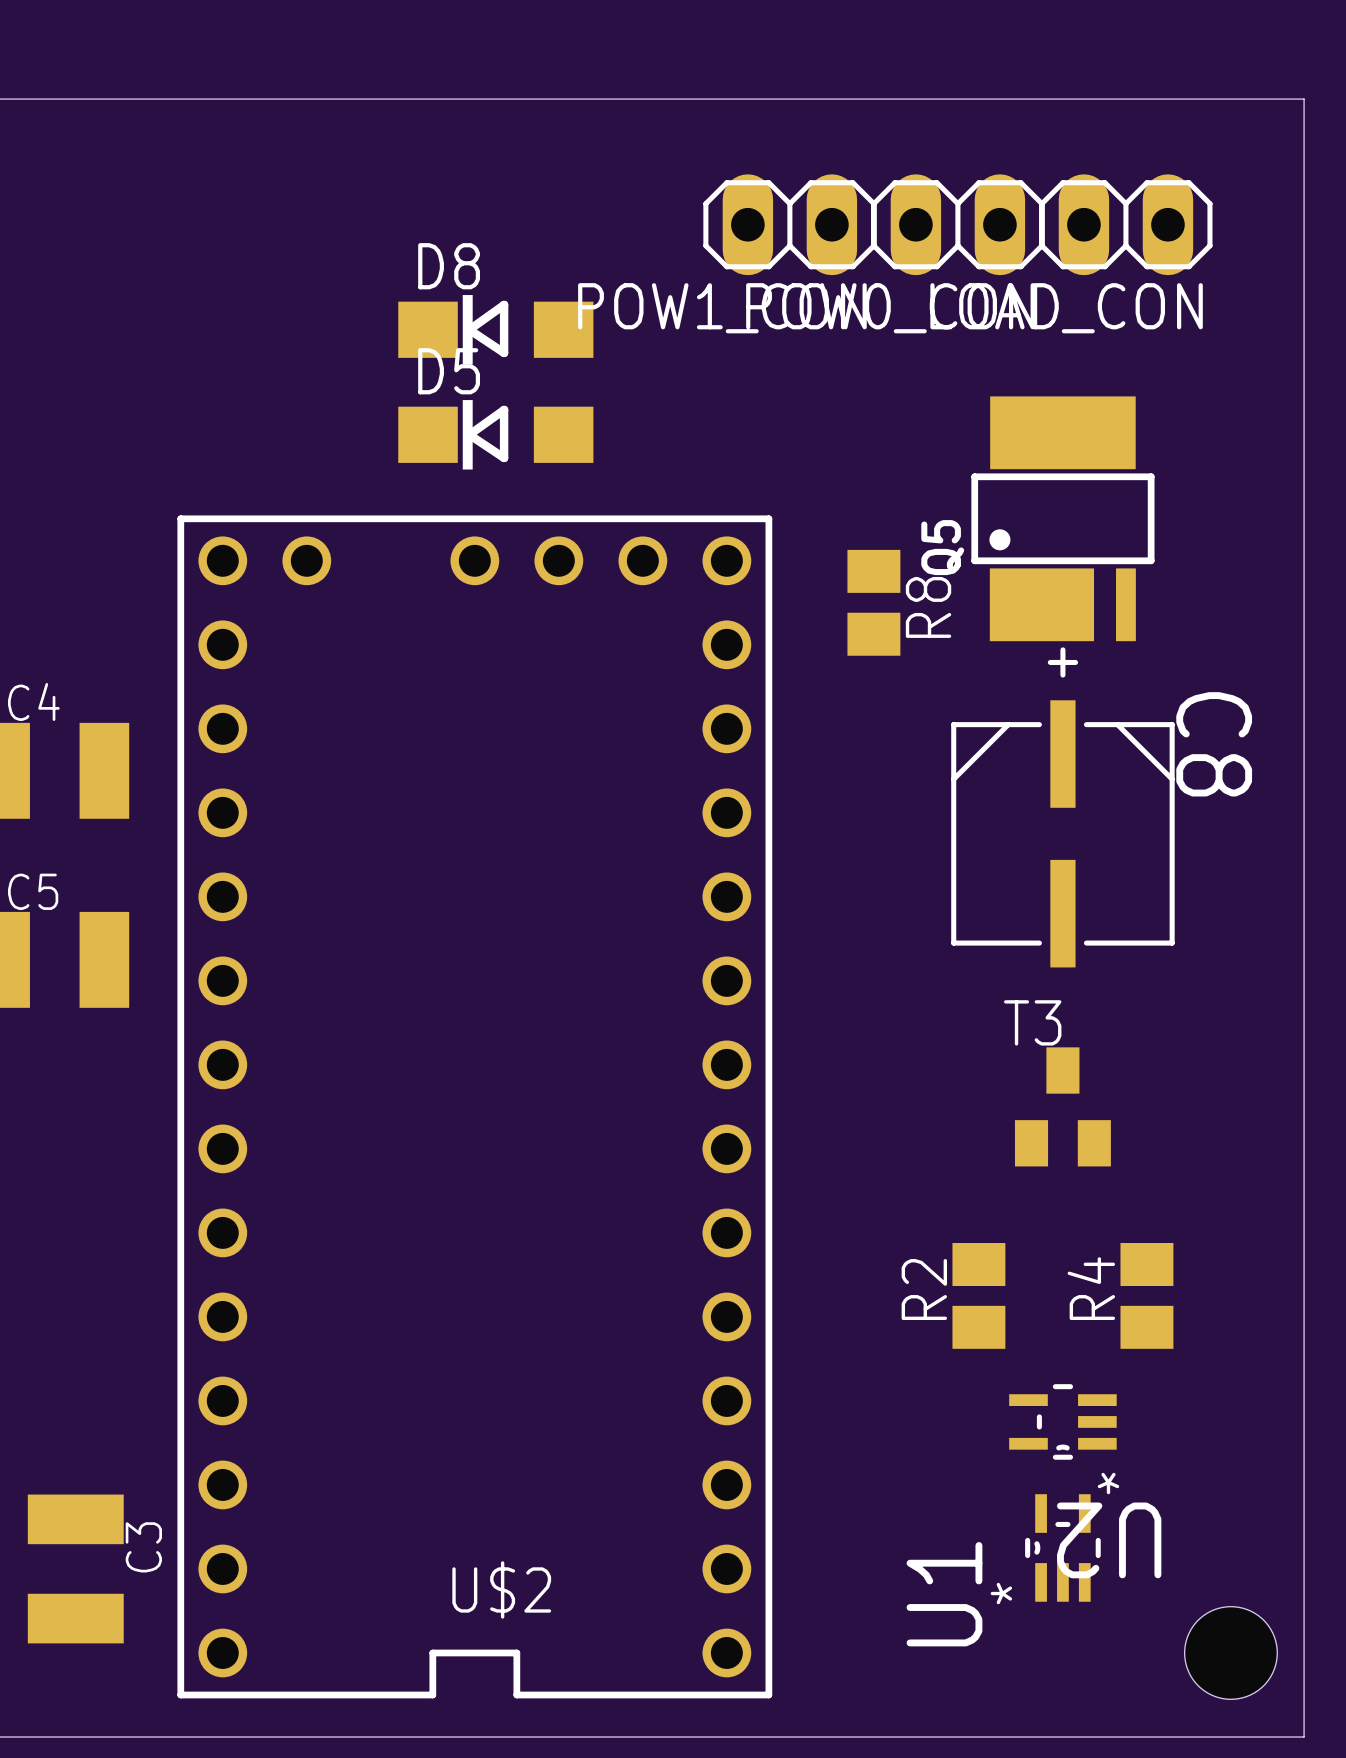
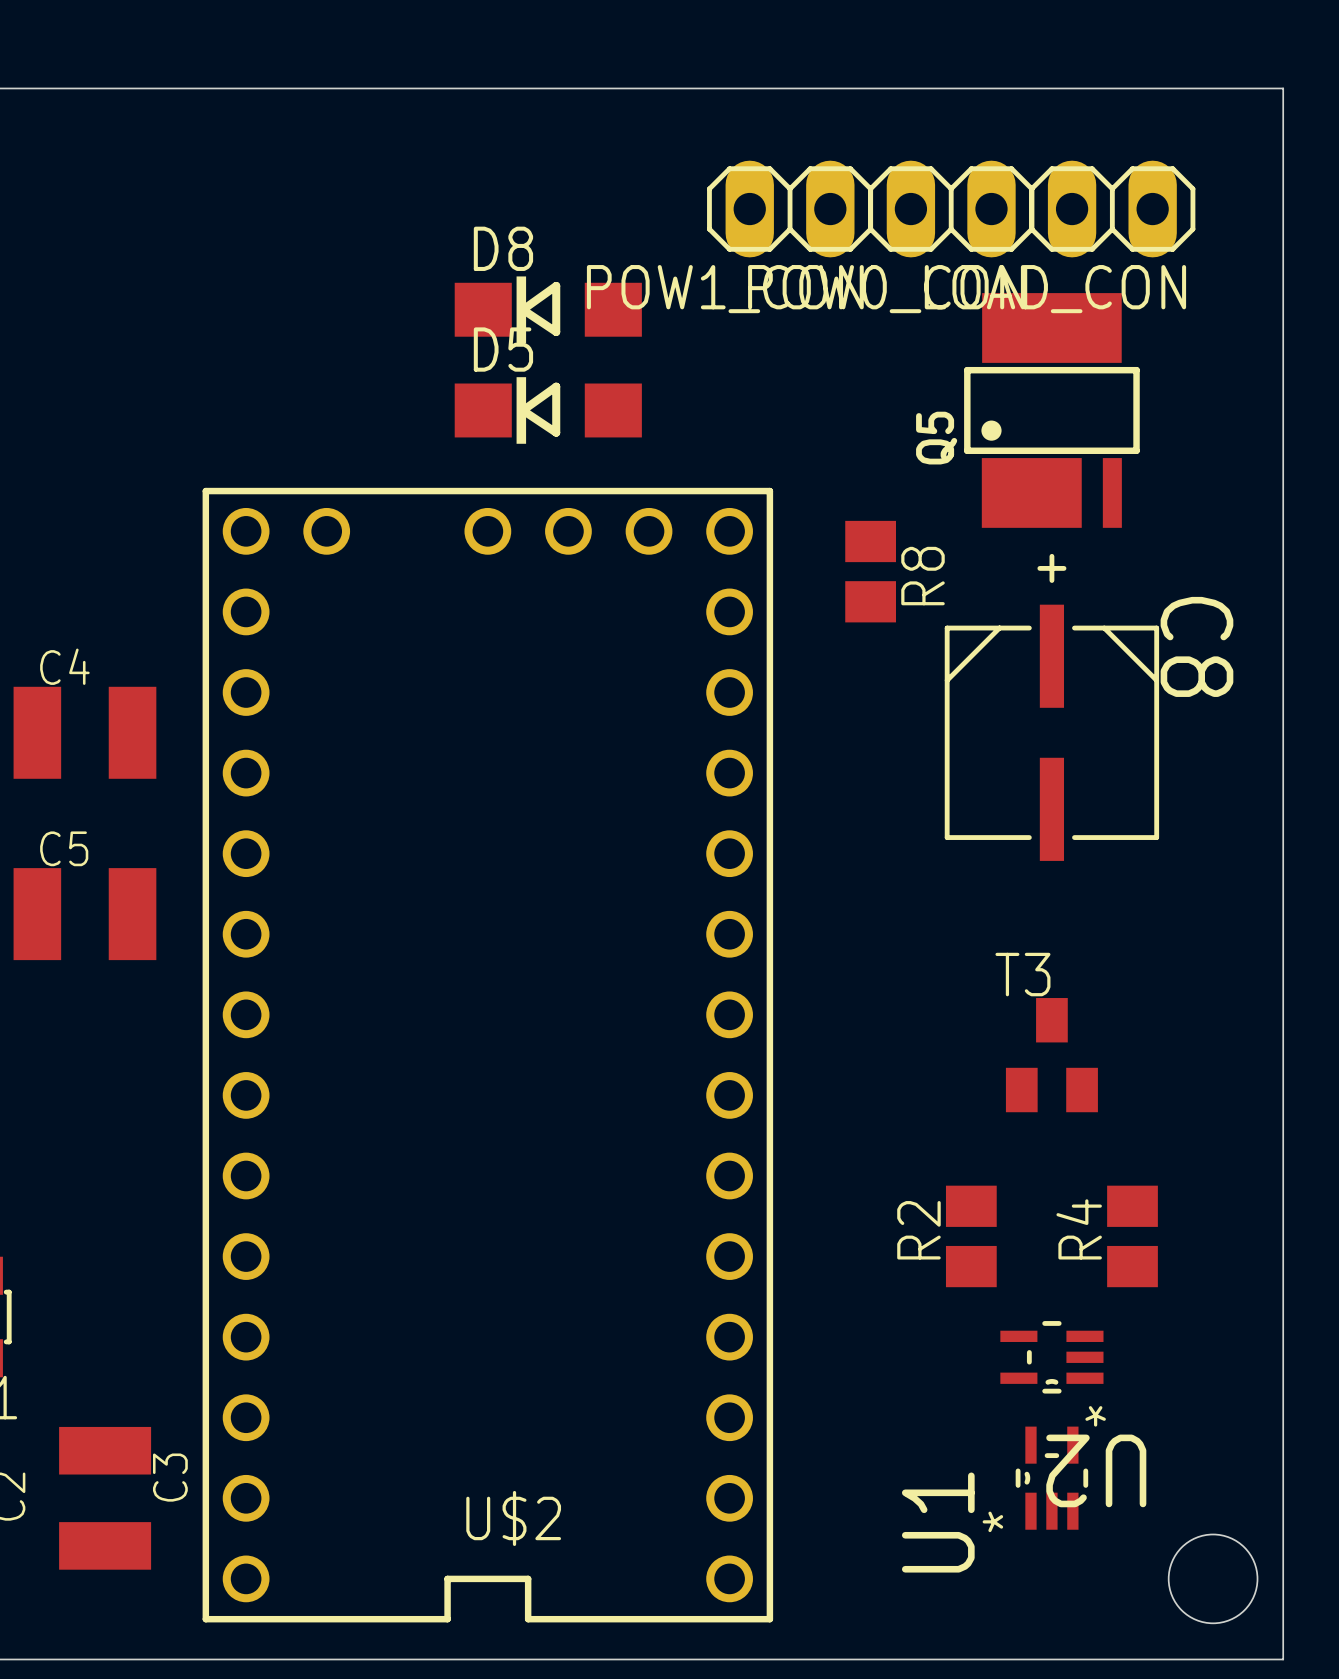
D8 position: (495, 329) -> (548, 309)
D5 position: (495, 434) -> (548, 410)
Q5 position: (1062, 518) -> (1051, 410)
C8 position: (1062, 807) -> (1051, 707)

